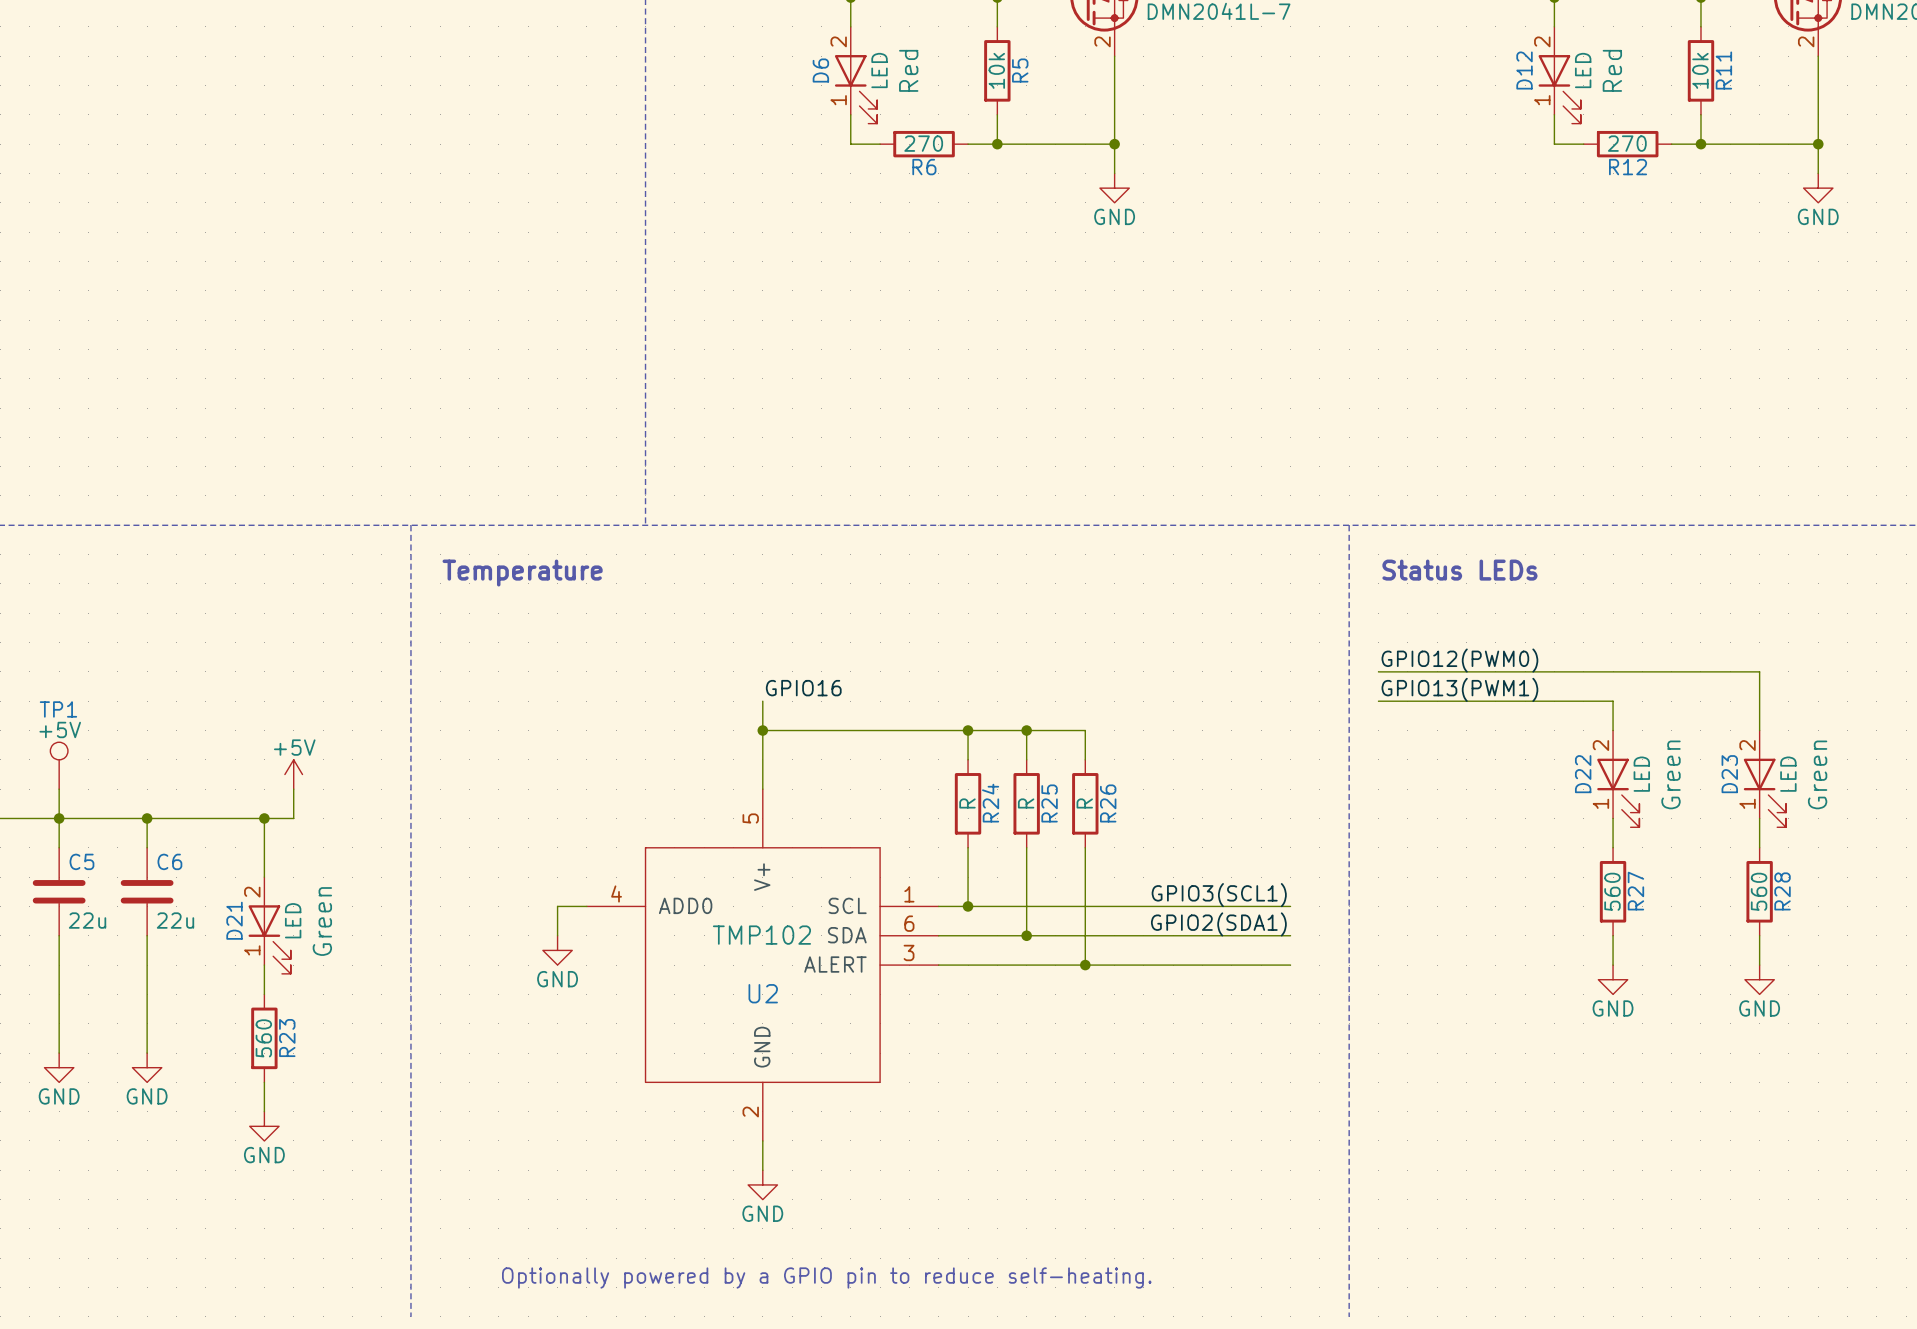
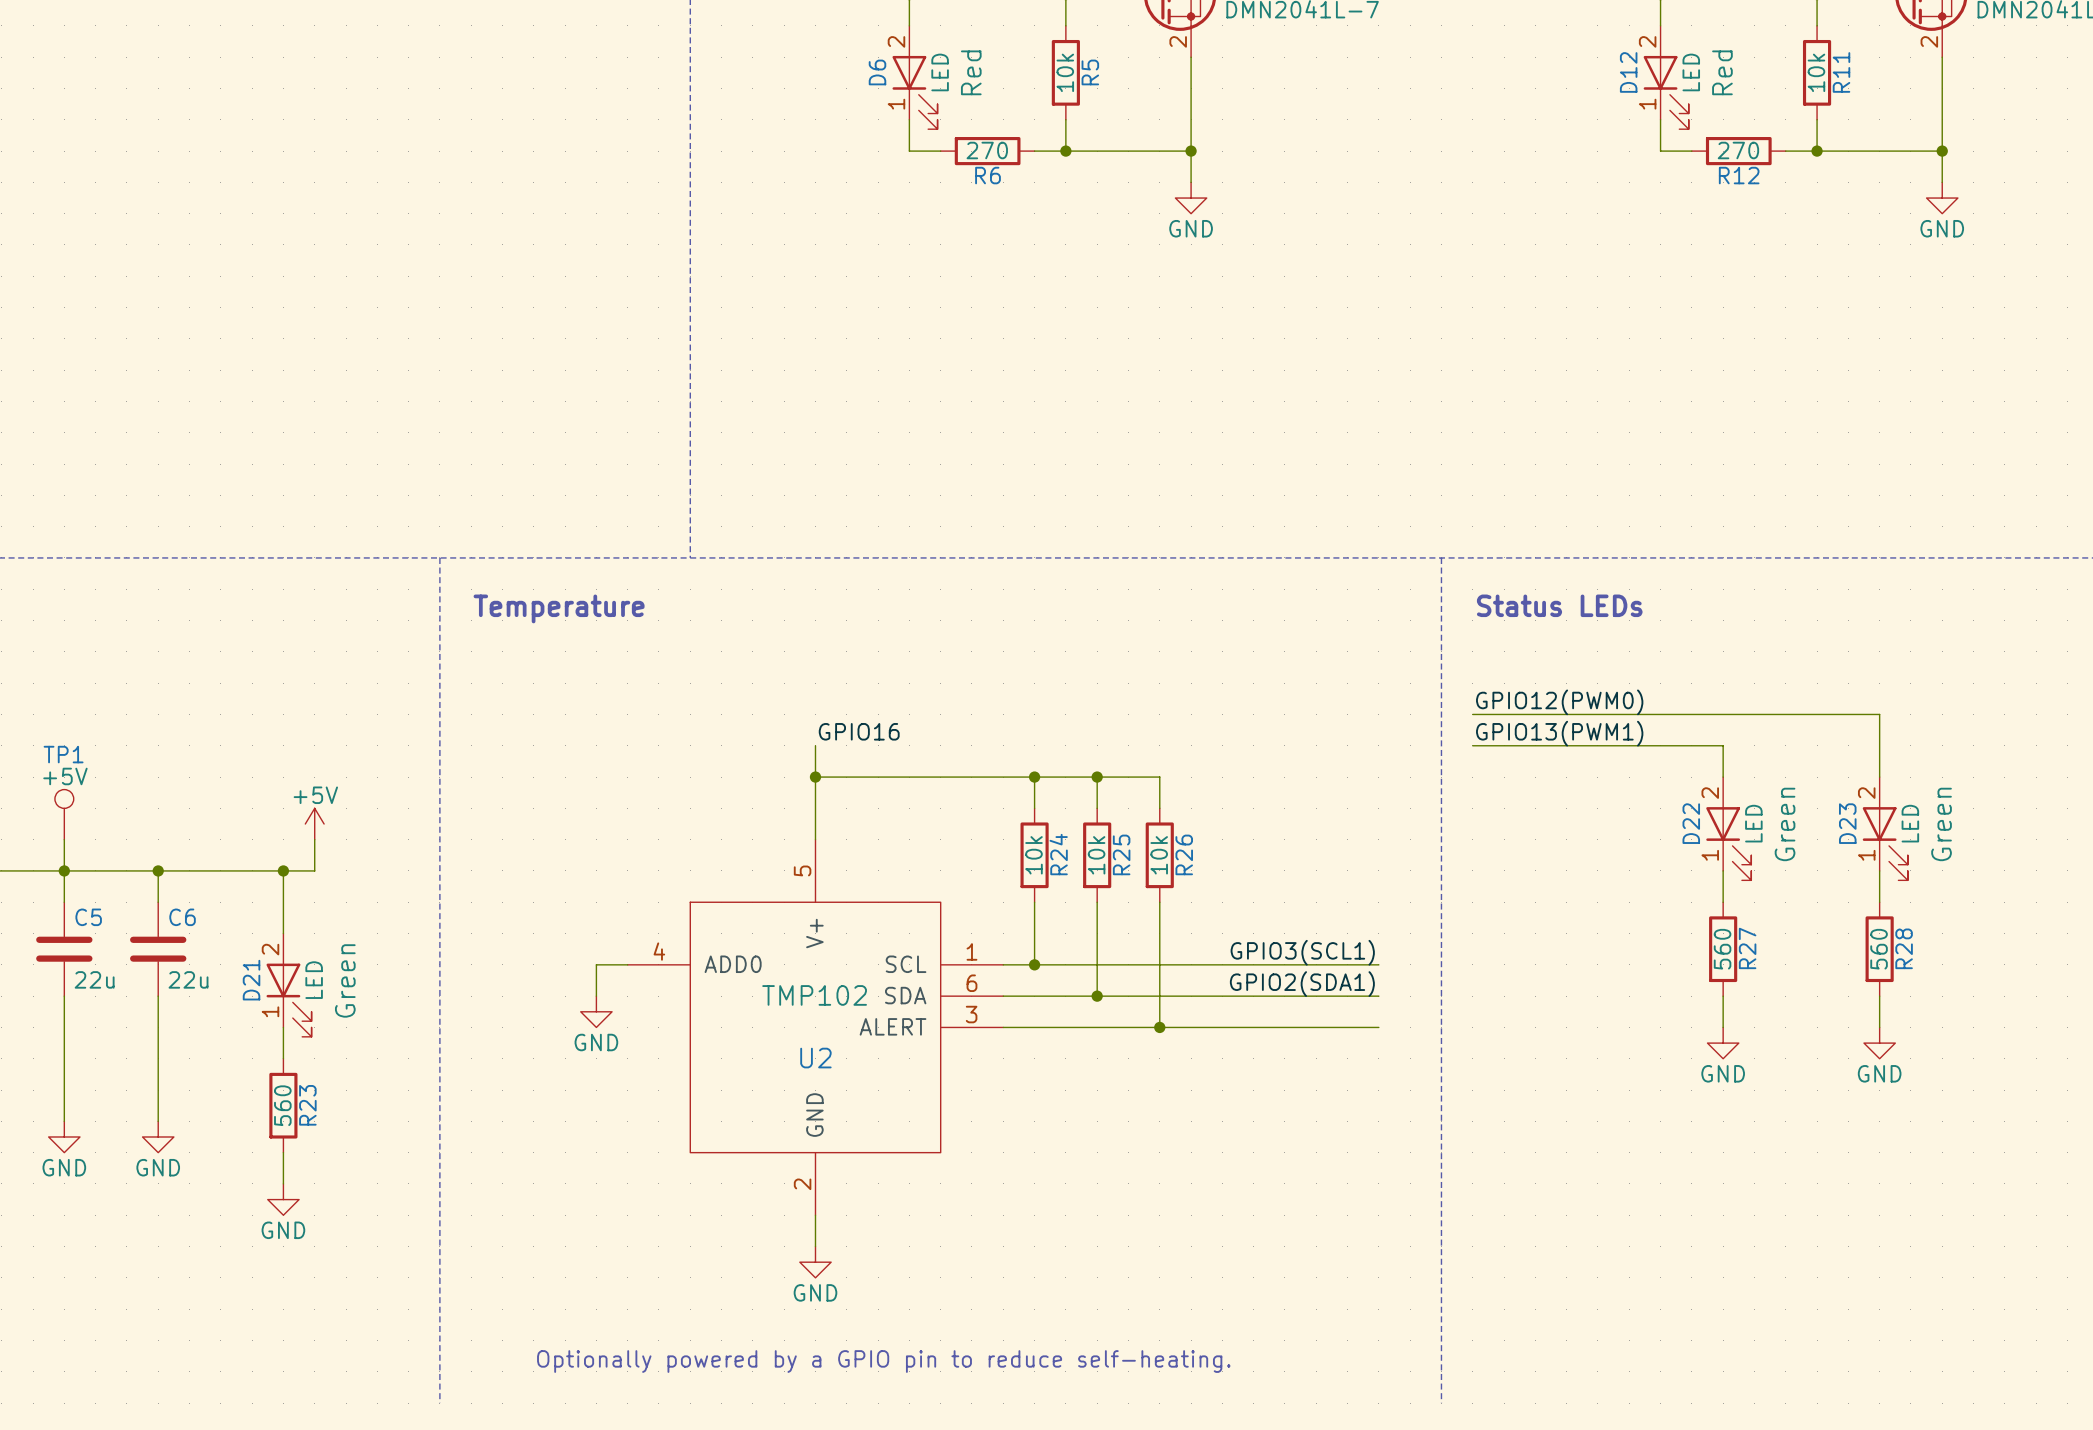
R24 value: R (967, 803) -> 10k (1033, 855)
R25 value: R (1026, 803) -> 10k (1096, 855)
R26 value: R (1084, 803) -> 10k (1159, 855)

